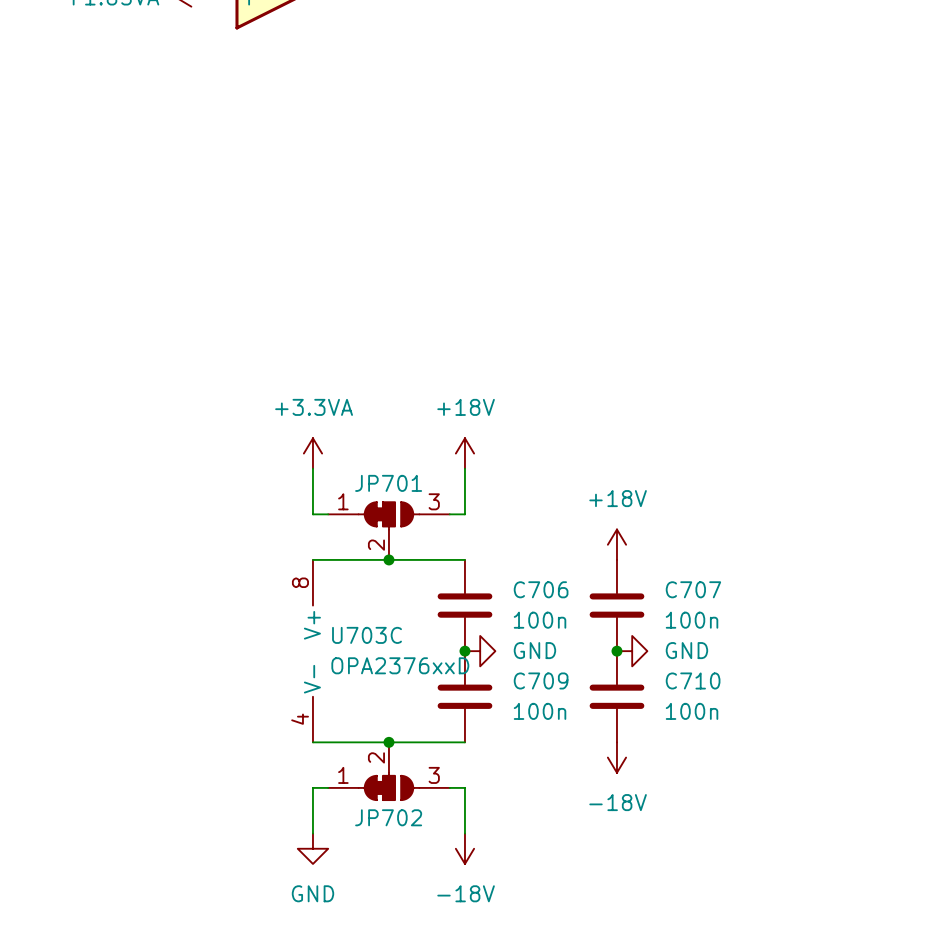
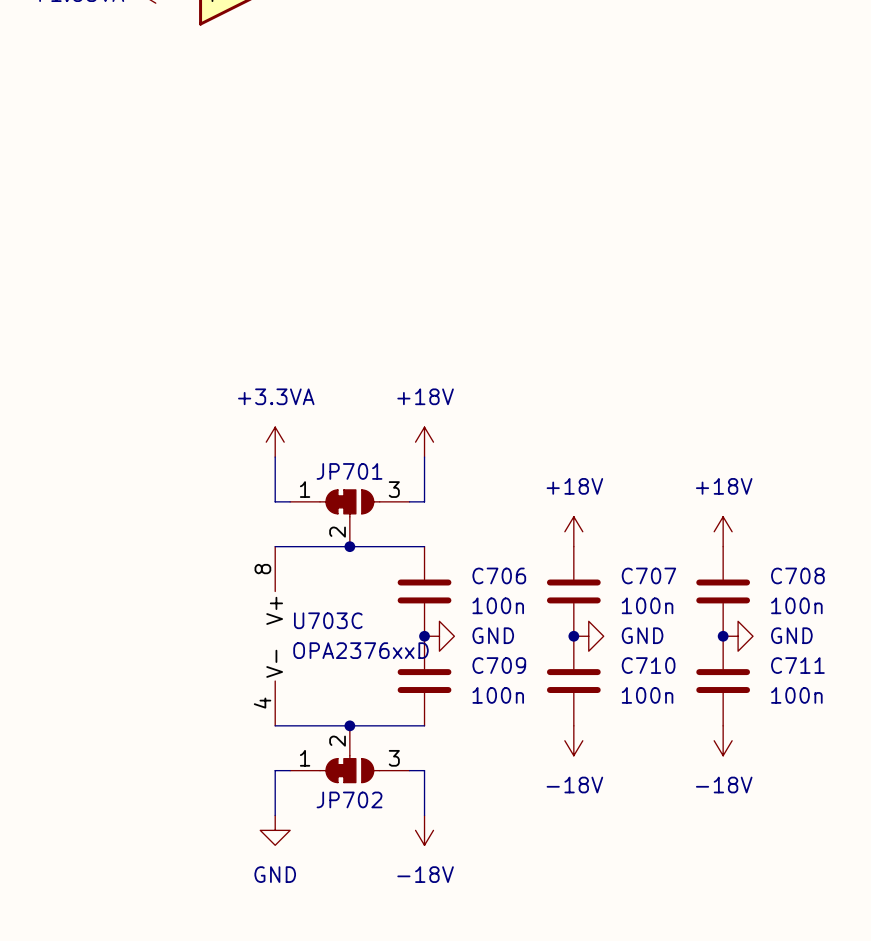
power symbol: none -> +18V (723, 531)
C708: none -> 100n (723, 591)
junction: none -> (723, 636)
power symbol: none -> GND (738, 636)
C711: none -> 100n (723, 681)
power symbol: none -> -18V (723, 740)

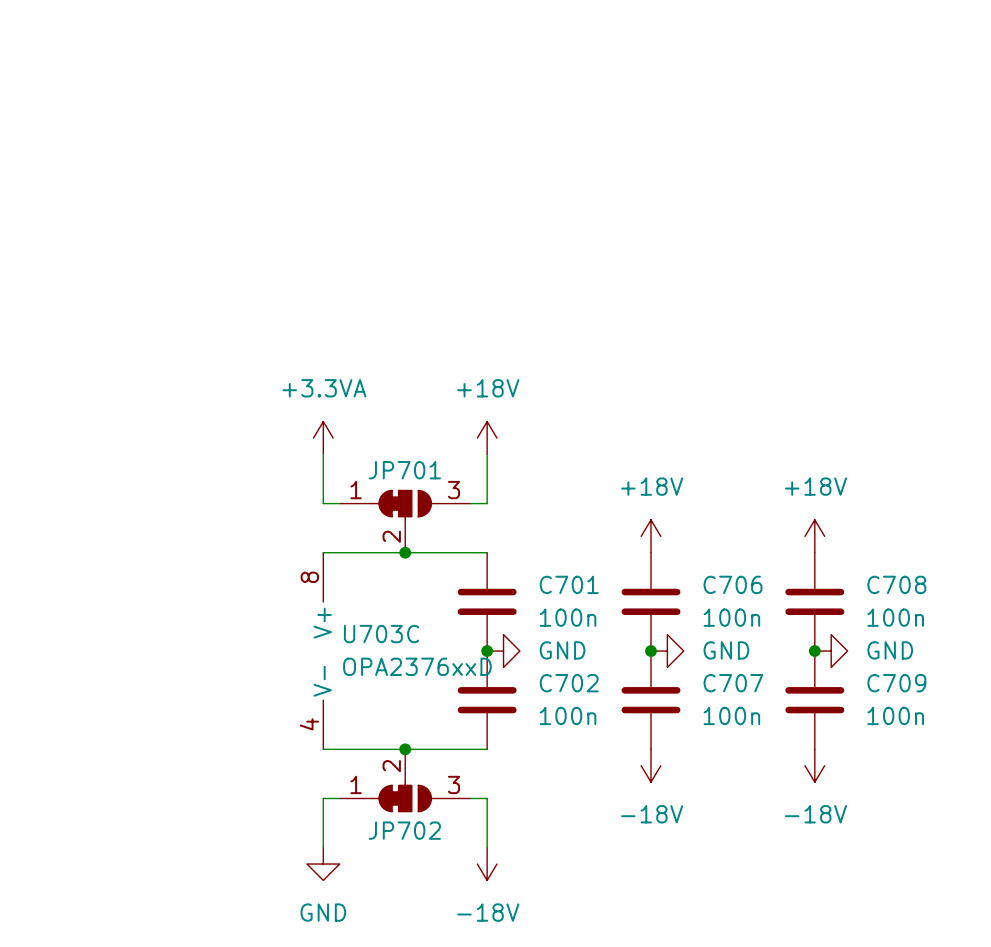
C706 name: C706 (499, 575) -> C701 (569, 584)
C707 name: C707 (648, 575) -> C706 (733, 584)
C709 name: C709 (499, 665) -> C702 (569, 683)
C710 name: C710 (648, 665) -> C707 (733, 683)
C711 name: C711 (797, 665) -> C709 (896, 683)

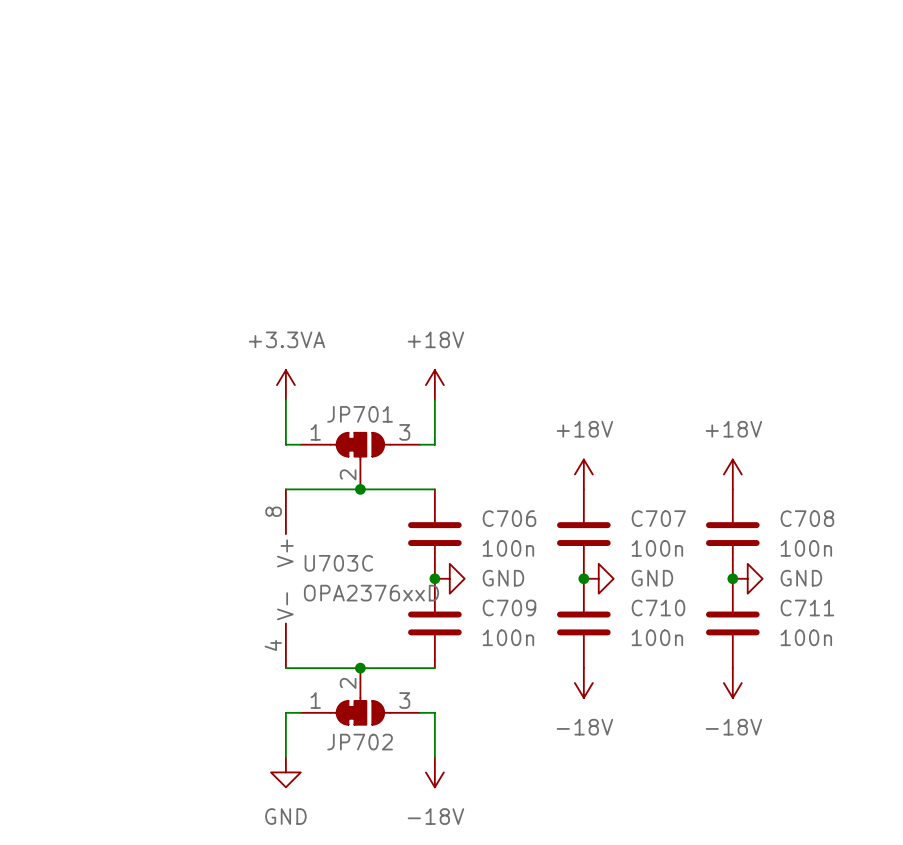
C701 name: C701 (569, 584) -> C706 (509, 518)
C706 name: C706 (733, 584) -> C707 (658, 518)
C702 name: C702 (569, 683) -> C709 (509, 608)
C707 name: C707 (733, 683) -> C710 (658, 608)
C709 name: C709 (896, 683) -> C711 (807, 608)

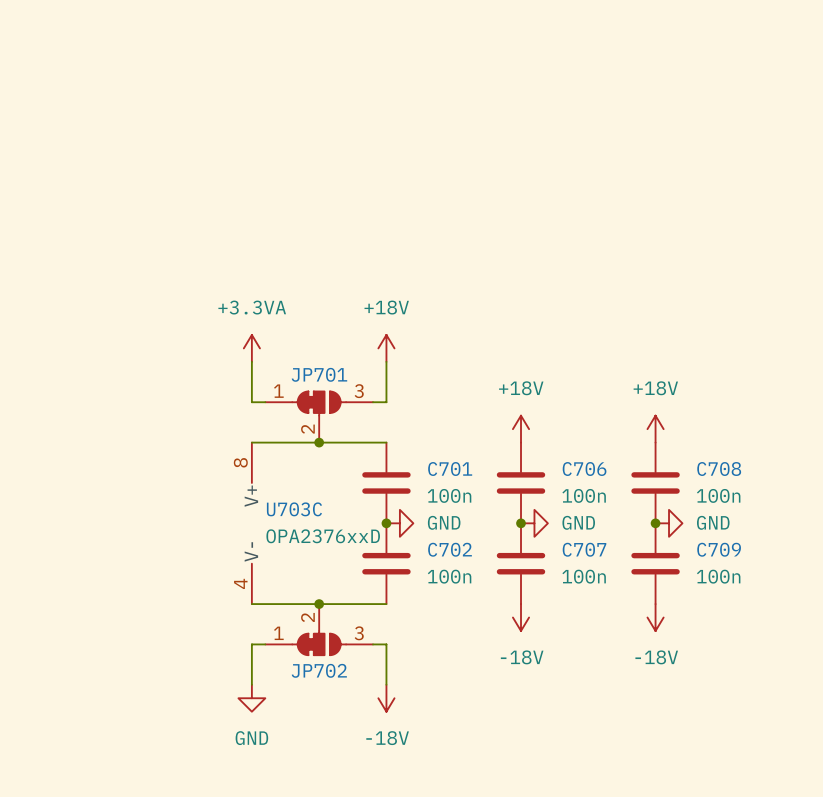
C706 name: C706 (509, 518) -> C701 (450, 469)
C707 name: C707 (658, 518) -> C706 (584, 469)
C709 name: C709 (509, 608) -> C702 (450, 549)
C710 name: C710 (658, 608) -> C707 (584, 549)
C711 name: C711 (807, 608) -> C709 (719, 549)

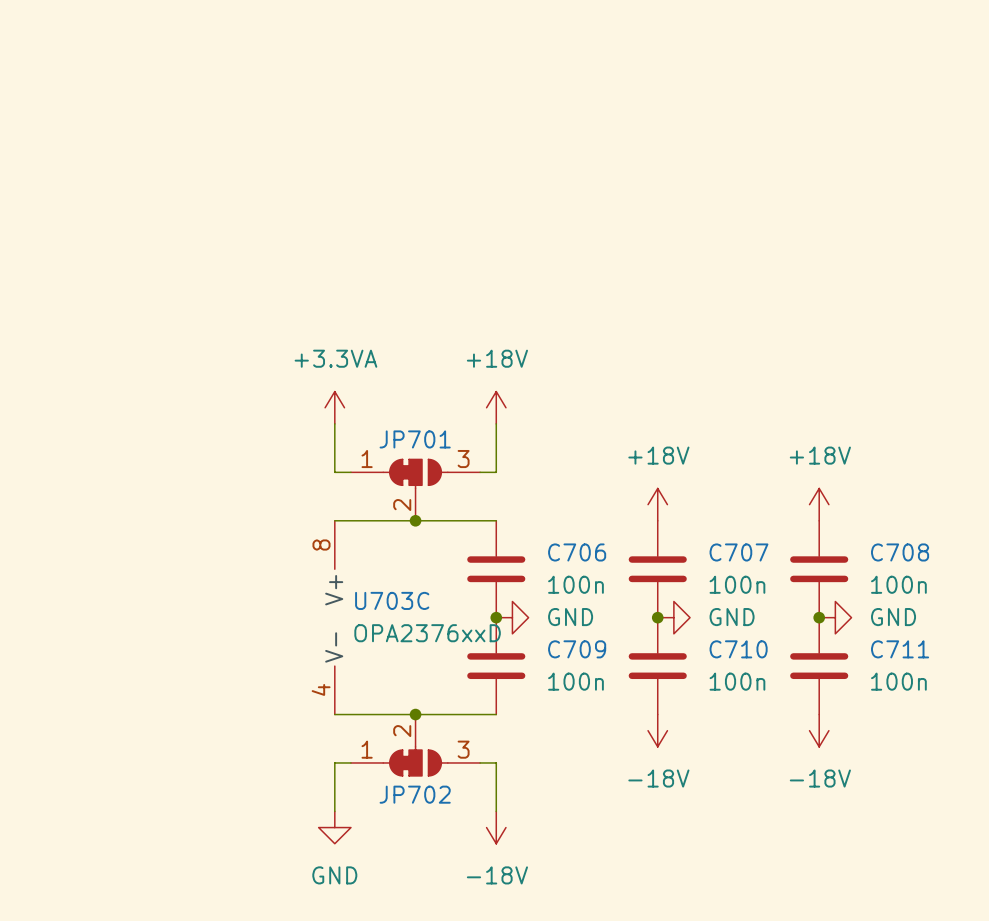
C701 name: C701 (450, 469) -> C706 (577, 552)
C706 name: C706 (584, 469) -> C707 (738, 552)
C702 name: C702 (450, 549) -> C709 (577, 649)
C707 name: C707 (584, 549) -> C710 (738, 649)
C709 name: C709 (719, 549) -> C711 (900, 649)

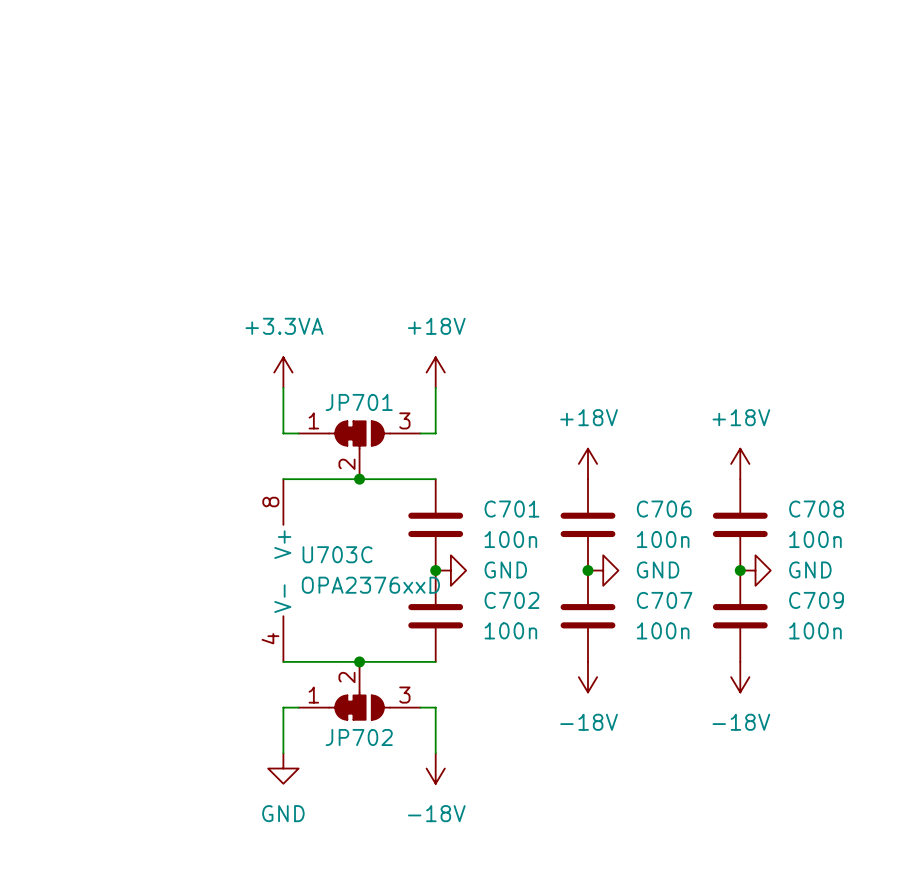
C706 name: C706 (577, 552) -> C701 (511, 509)
C707 name: C707 (738, 552) -> C706 (664, 509)
C709 name: C709 (577, 649) -> C702 (511, 600)
C710 name: C710 (738, 649) -> C707 (664, 600)
C711 name: C711 (900, 649) -> C709 (816, 600)

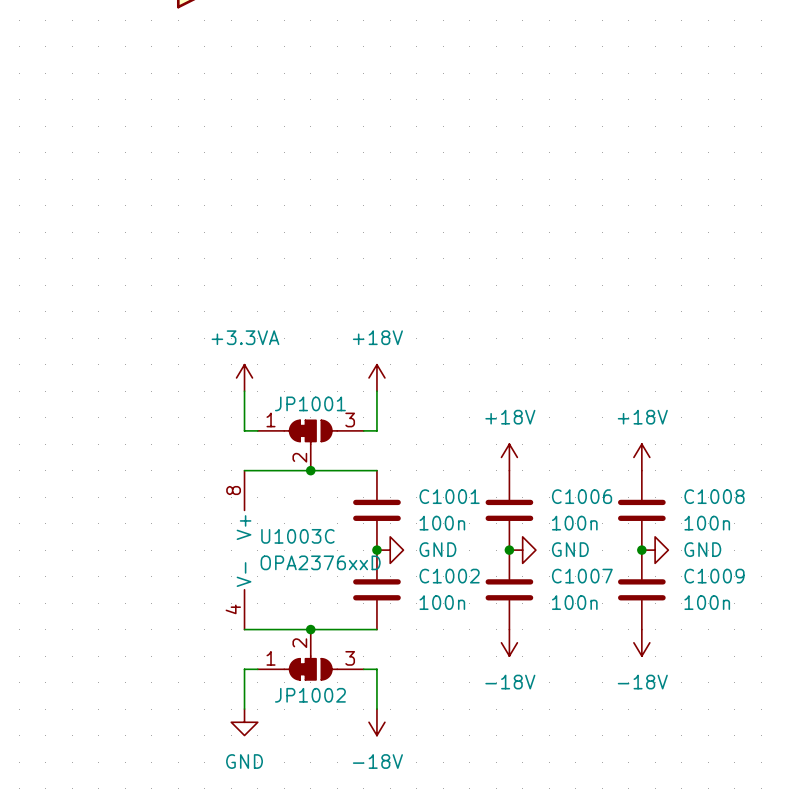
JP701 name: JP701 (359, 402) -> JP1001 (310, 403)
C701 name: C701 (511, 509) -> C1001 (449, 496)
C706 name: C706 (664, 509) -> C1006 (582, 496)
C708 name: C708 (816, 509) -> C1008 (714, 496)
U703C name: U703C (337, 554) -> U1003C (297, 536)
C702 name: C702 (511, 600) -> C1002 (449, 576)
C707 name: C707 (664, 600) -> C1007 (582, 576)
C709 name: C709 (816, 600) -> C1009 (714, 576)
JP702 name: JP702 (359, 737) -> JP1002 (310, 695)

